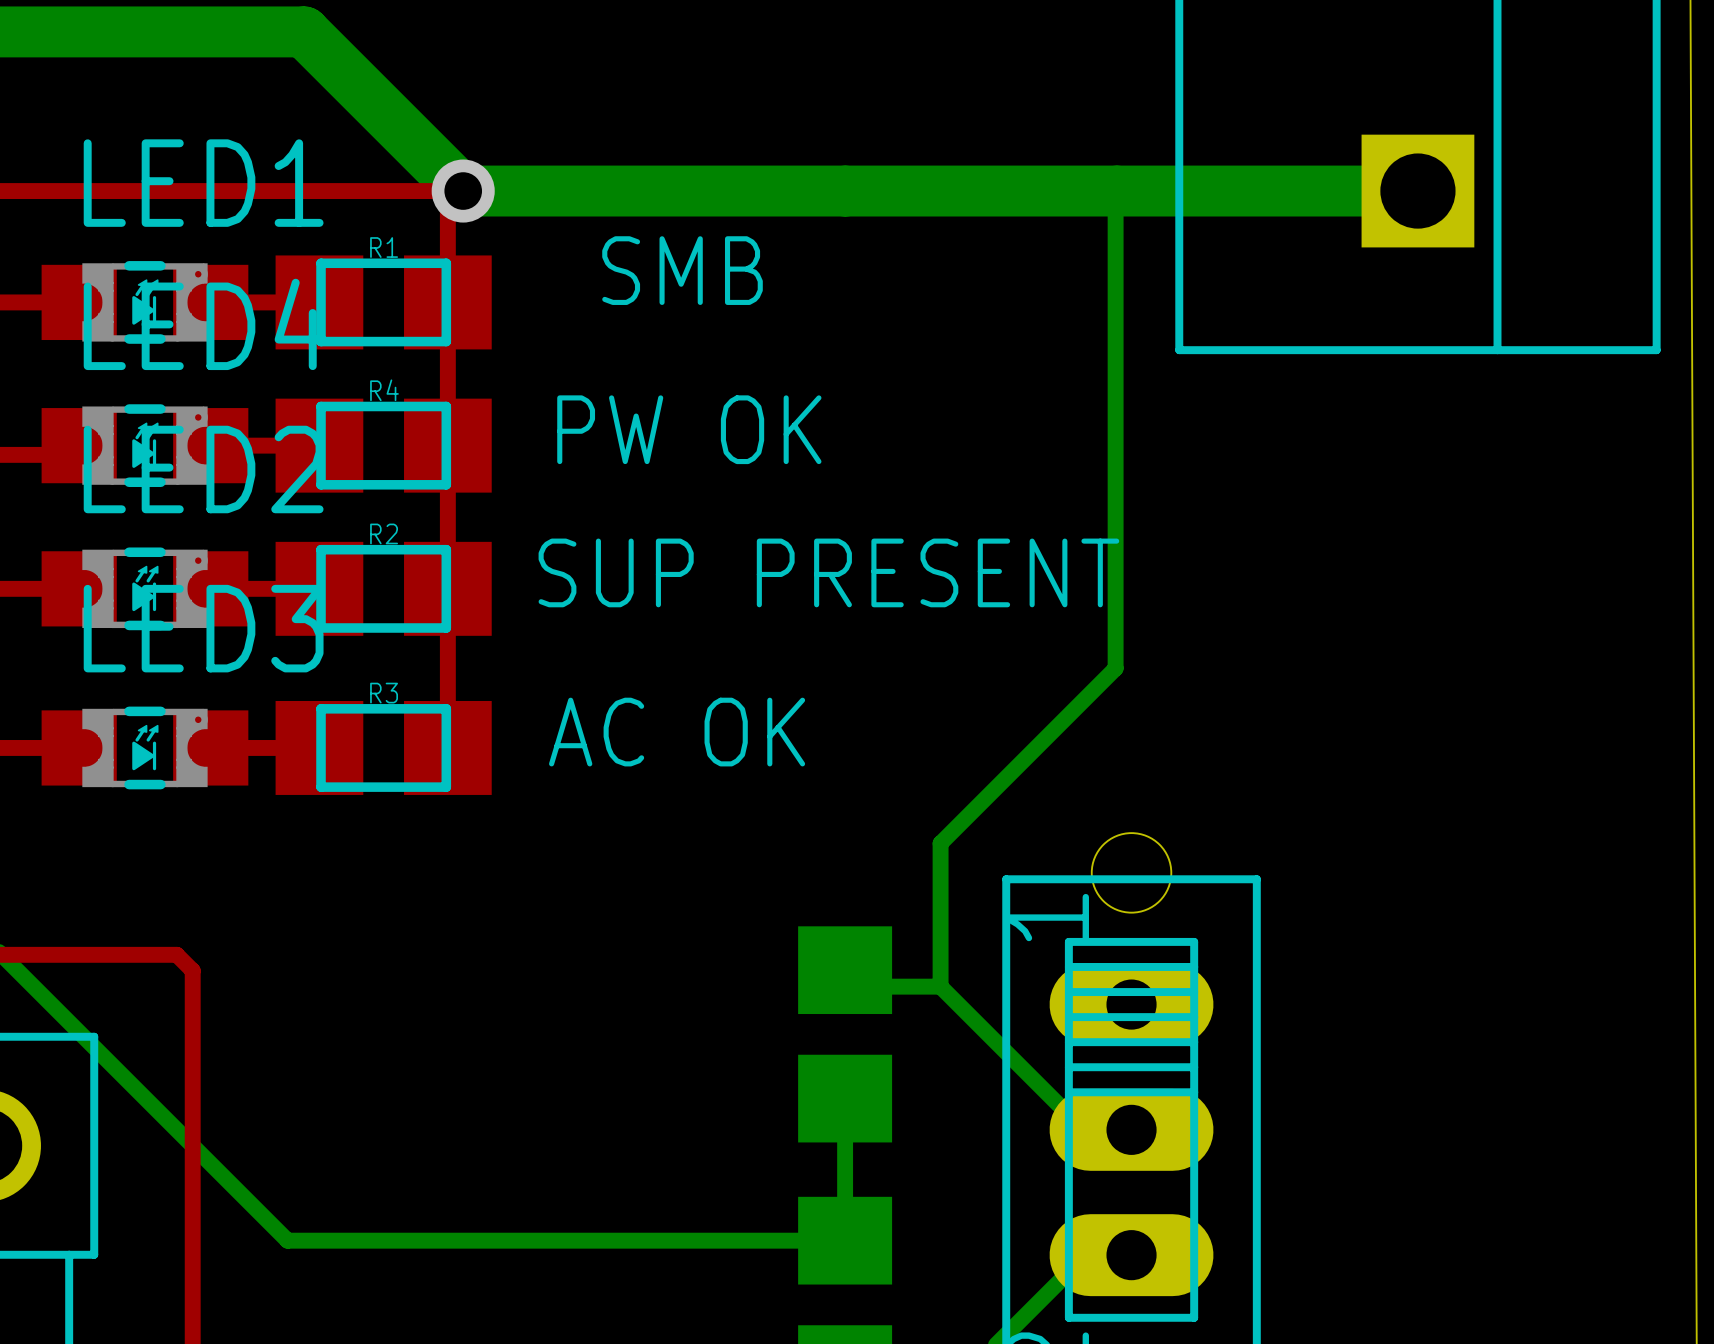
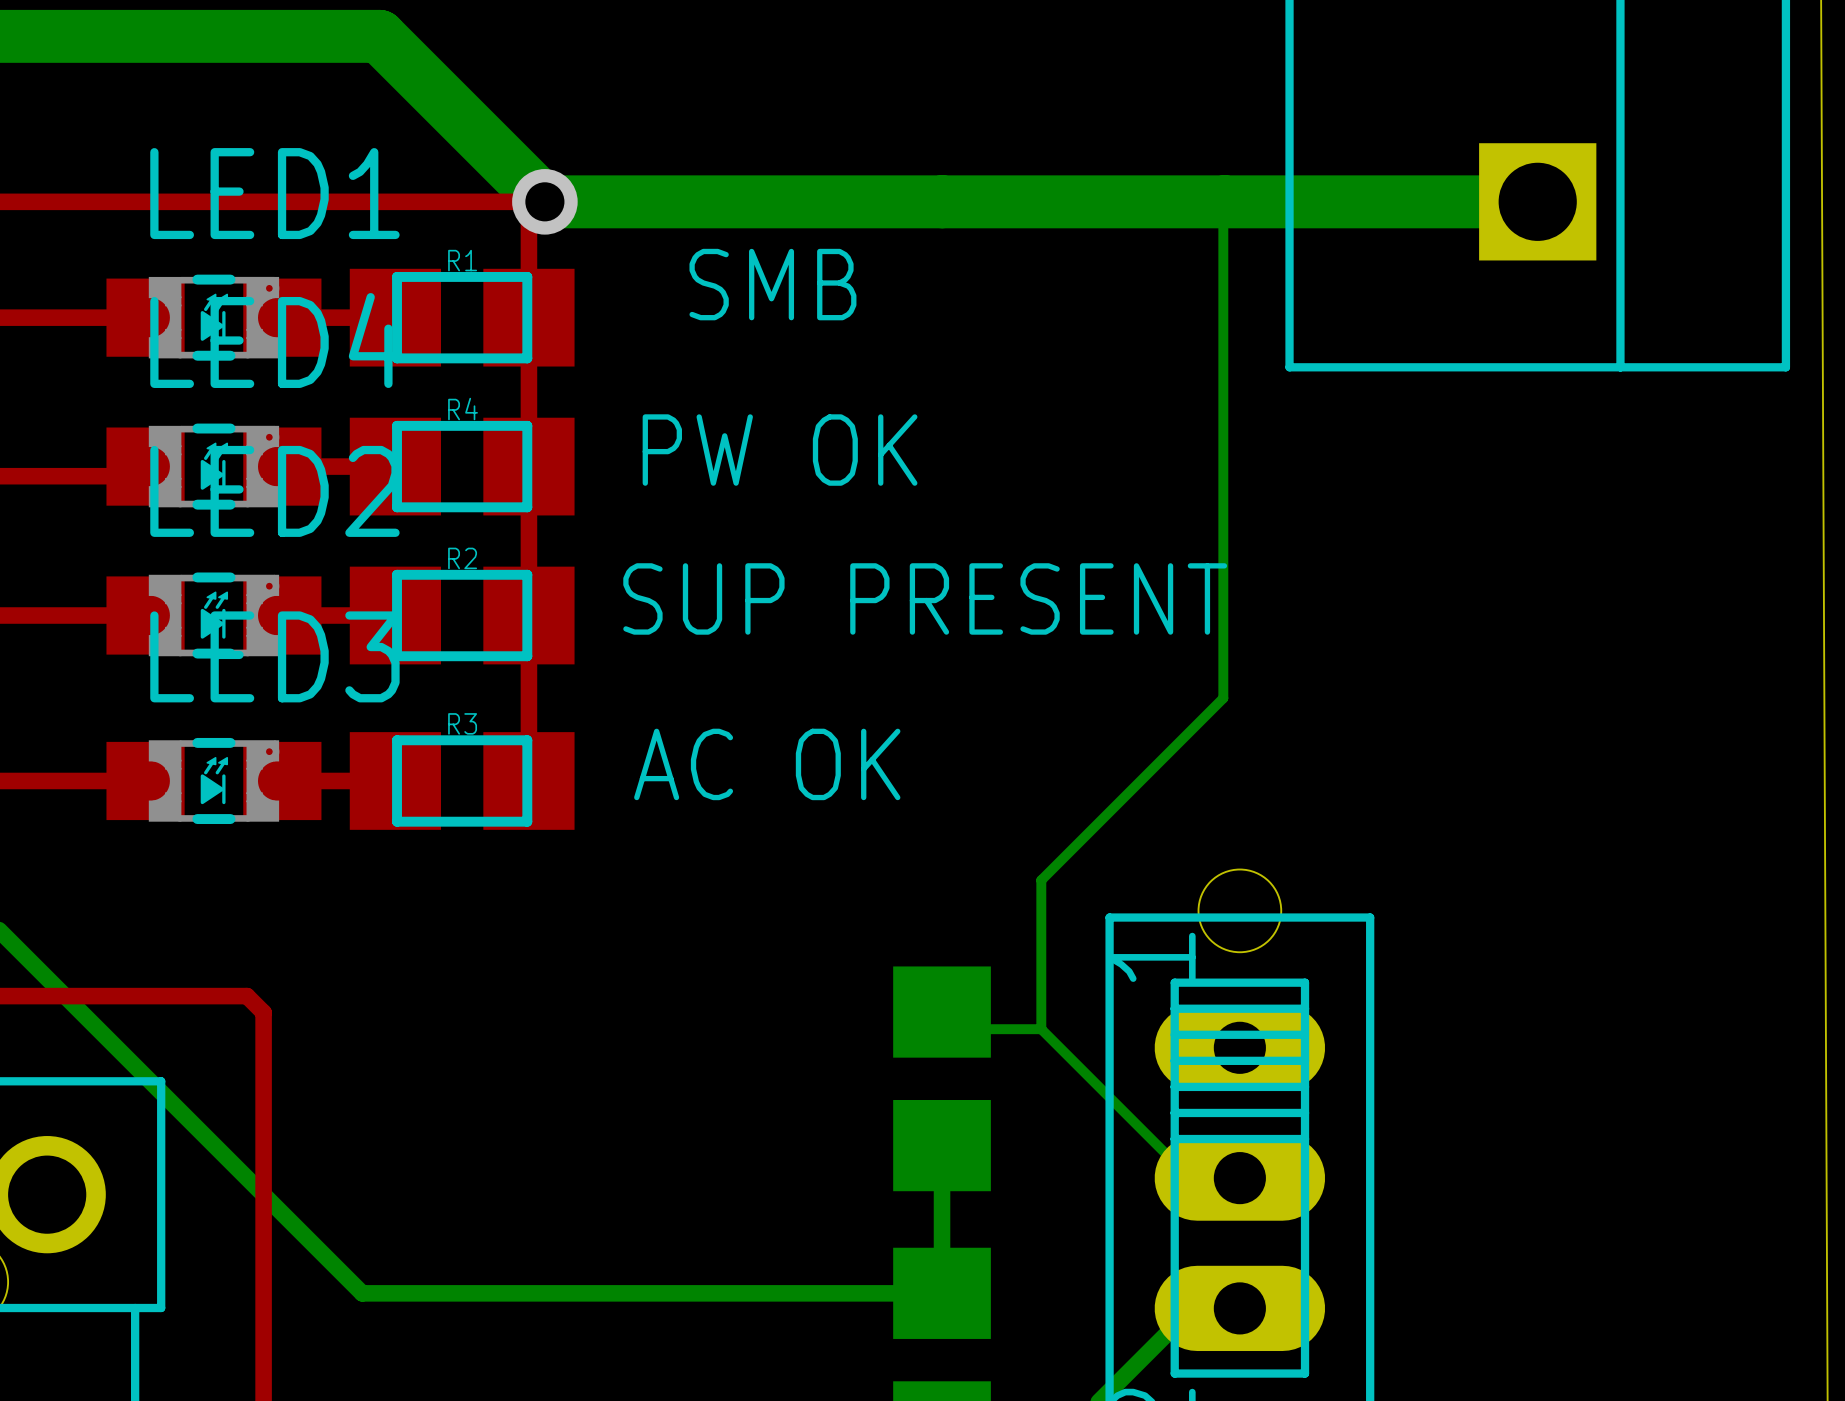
bottom track width: thick (1115, 192) (1115, 668) (940, 843) (940, 986) -> thin (1223, 203) (1223, 698) (1041, 880) (1041, 1029)
bottom track width: thick (861, 986) (940, 986) -> thin (959, 1029) (1041, 1029)
bottom track width: thick (940, 986) (1083, 1129) (1131, 1129) -> thin (1041, 1029) (1190, 1178) (1239, 1178)

